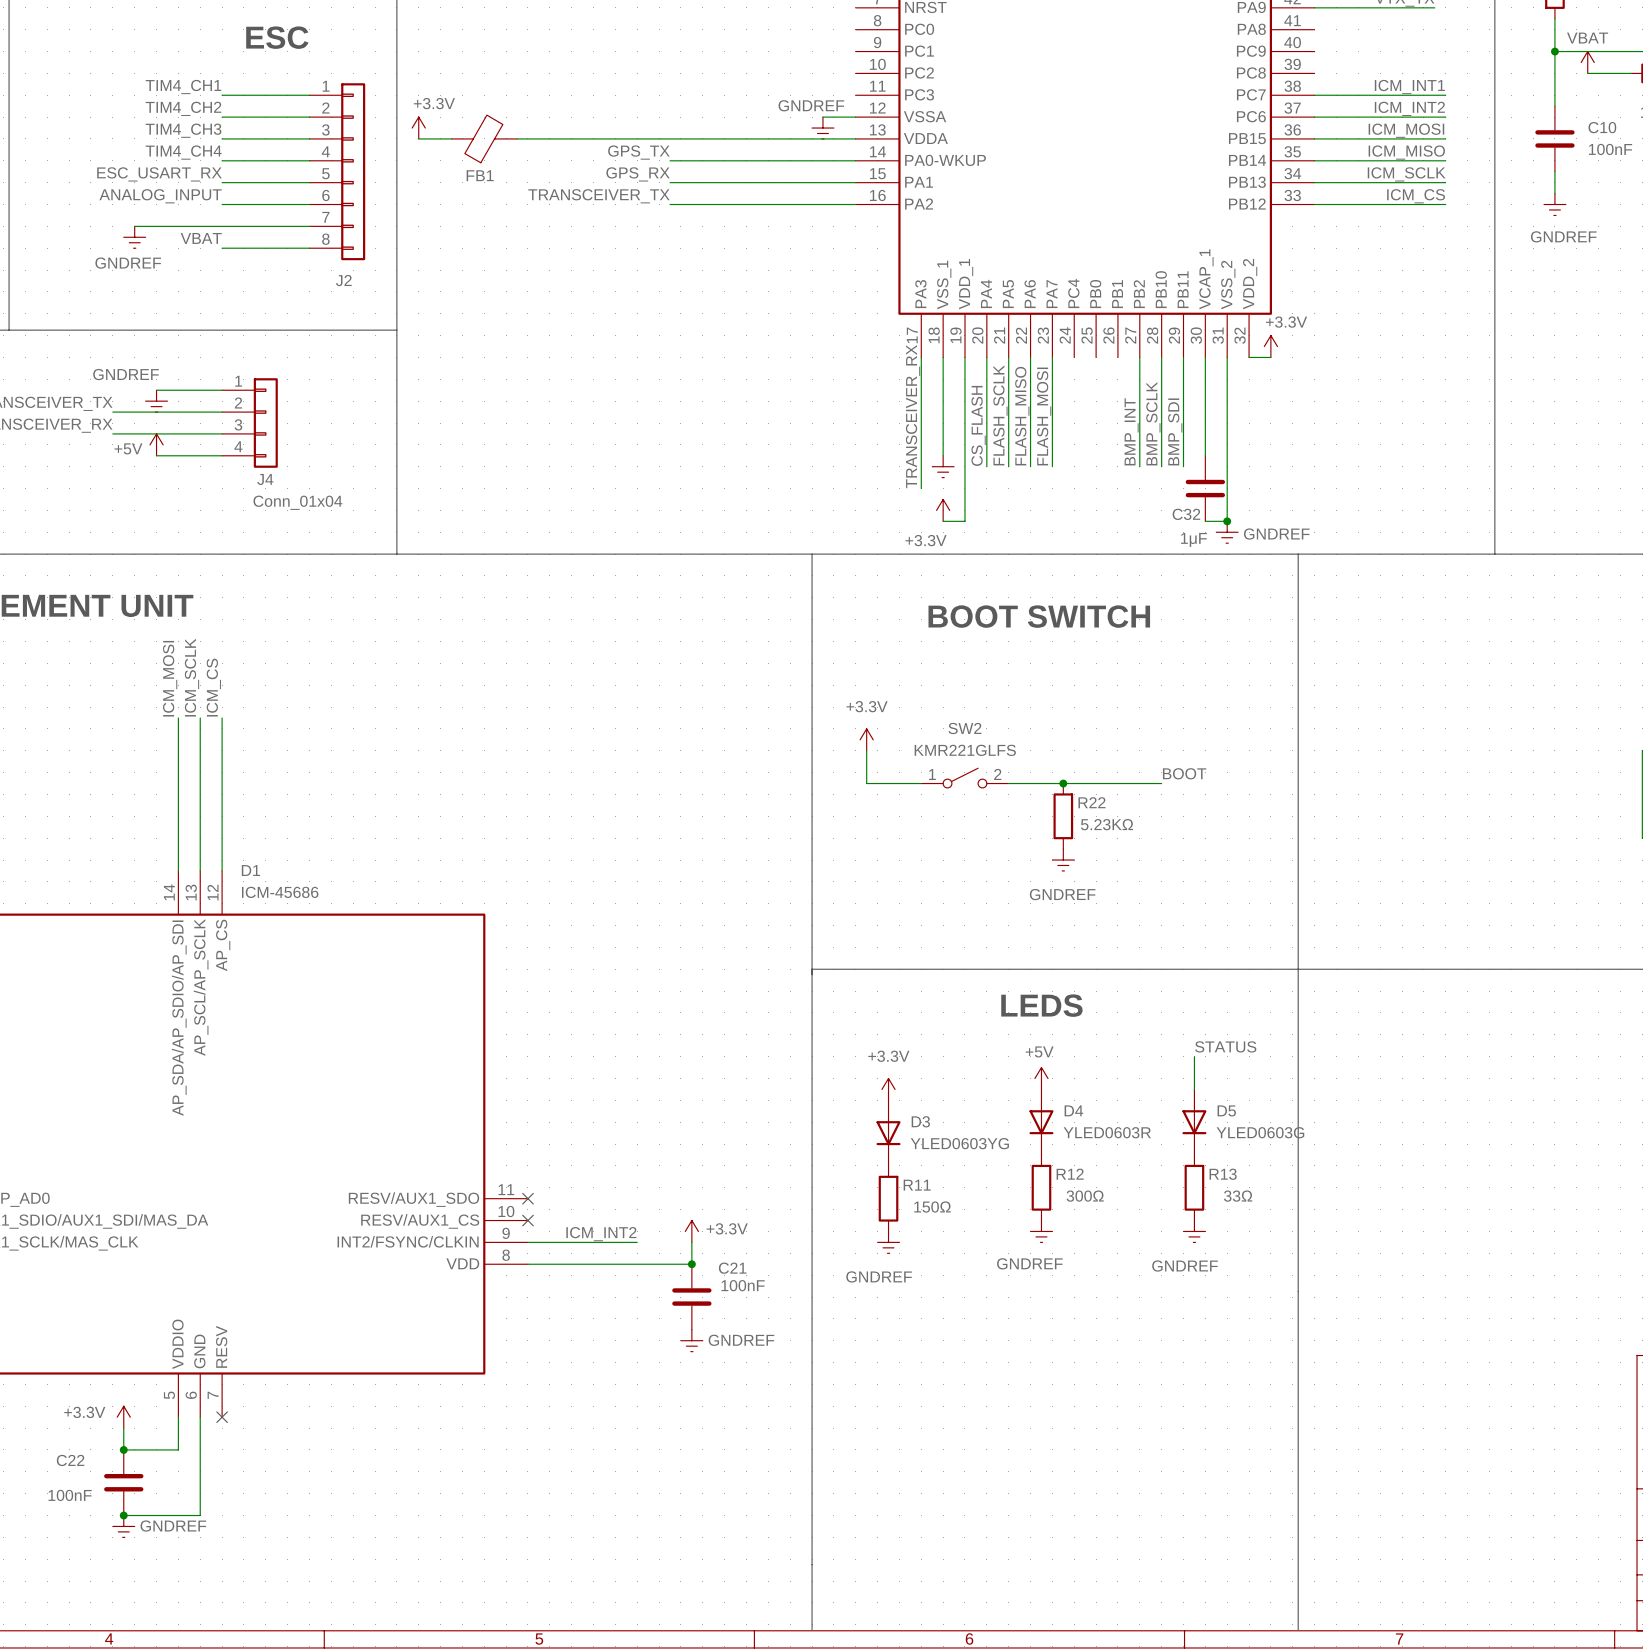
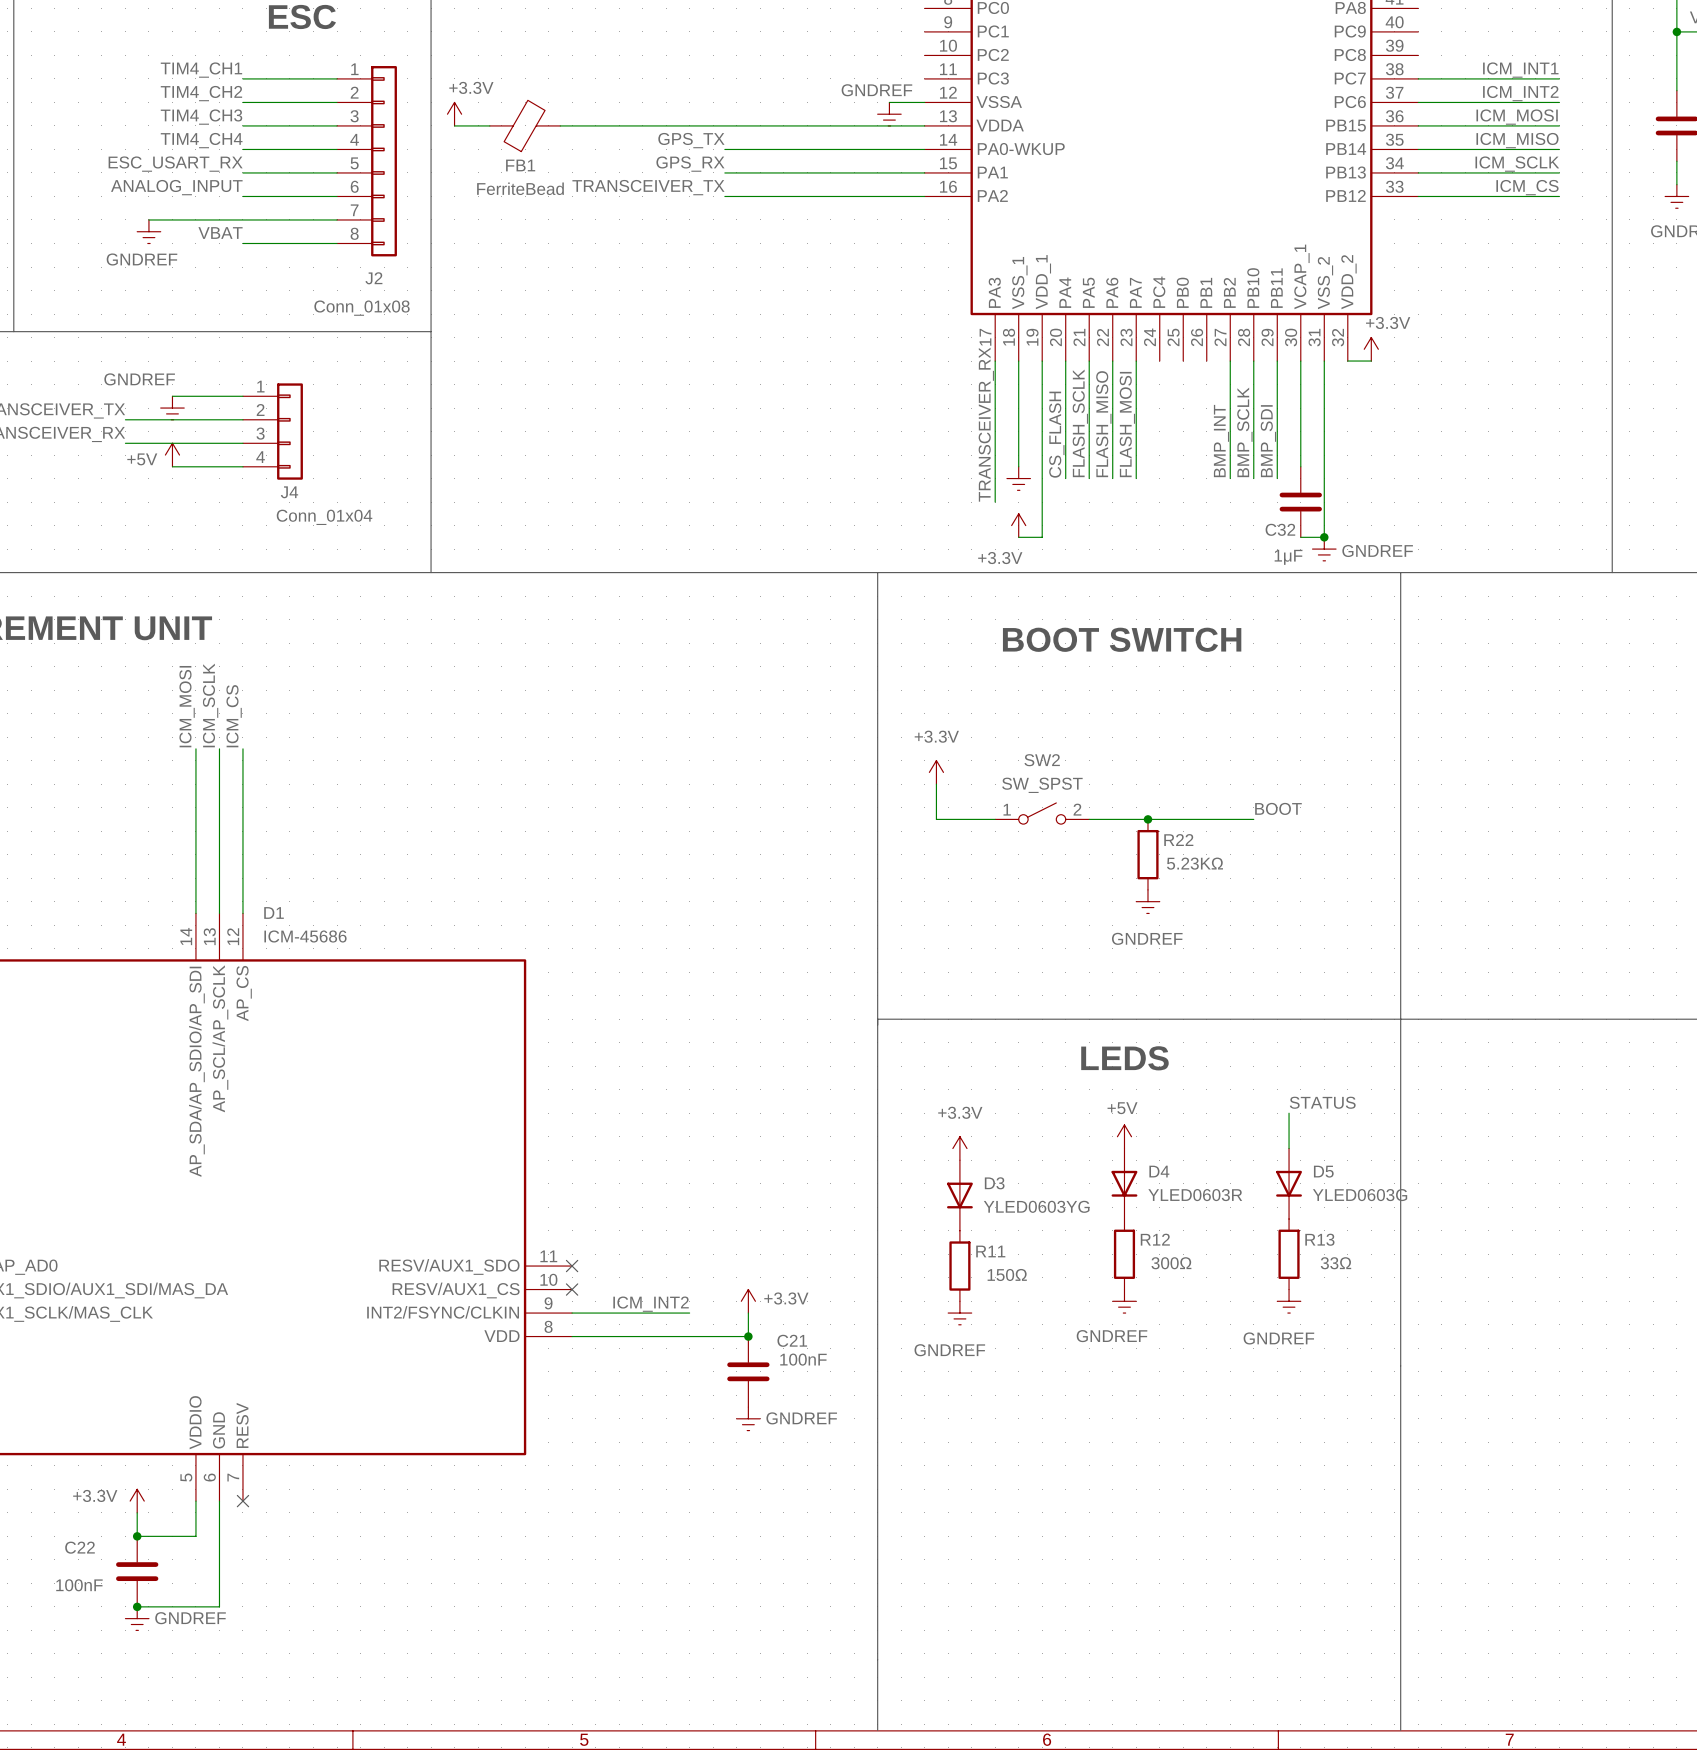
FB1 value: none -> FerriteBead (520, 188)
J2 value: none -> Conn_01x08 (362, 308)
SW2 value: KMR221GLFS (965, 750) -> SW_SPST (1042, 785)

